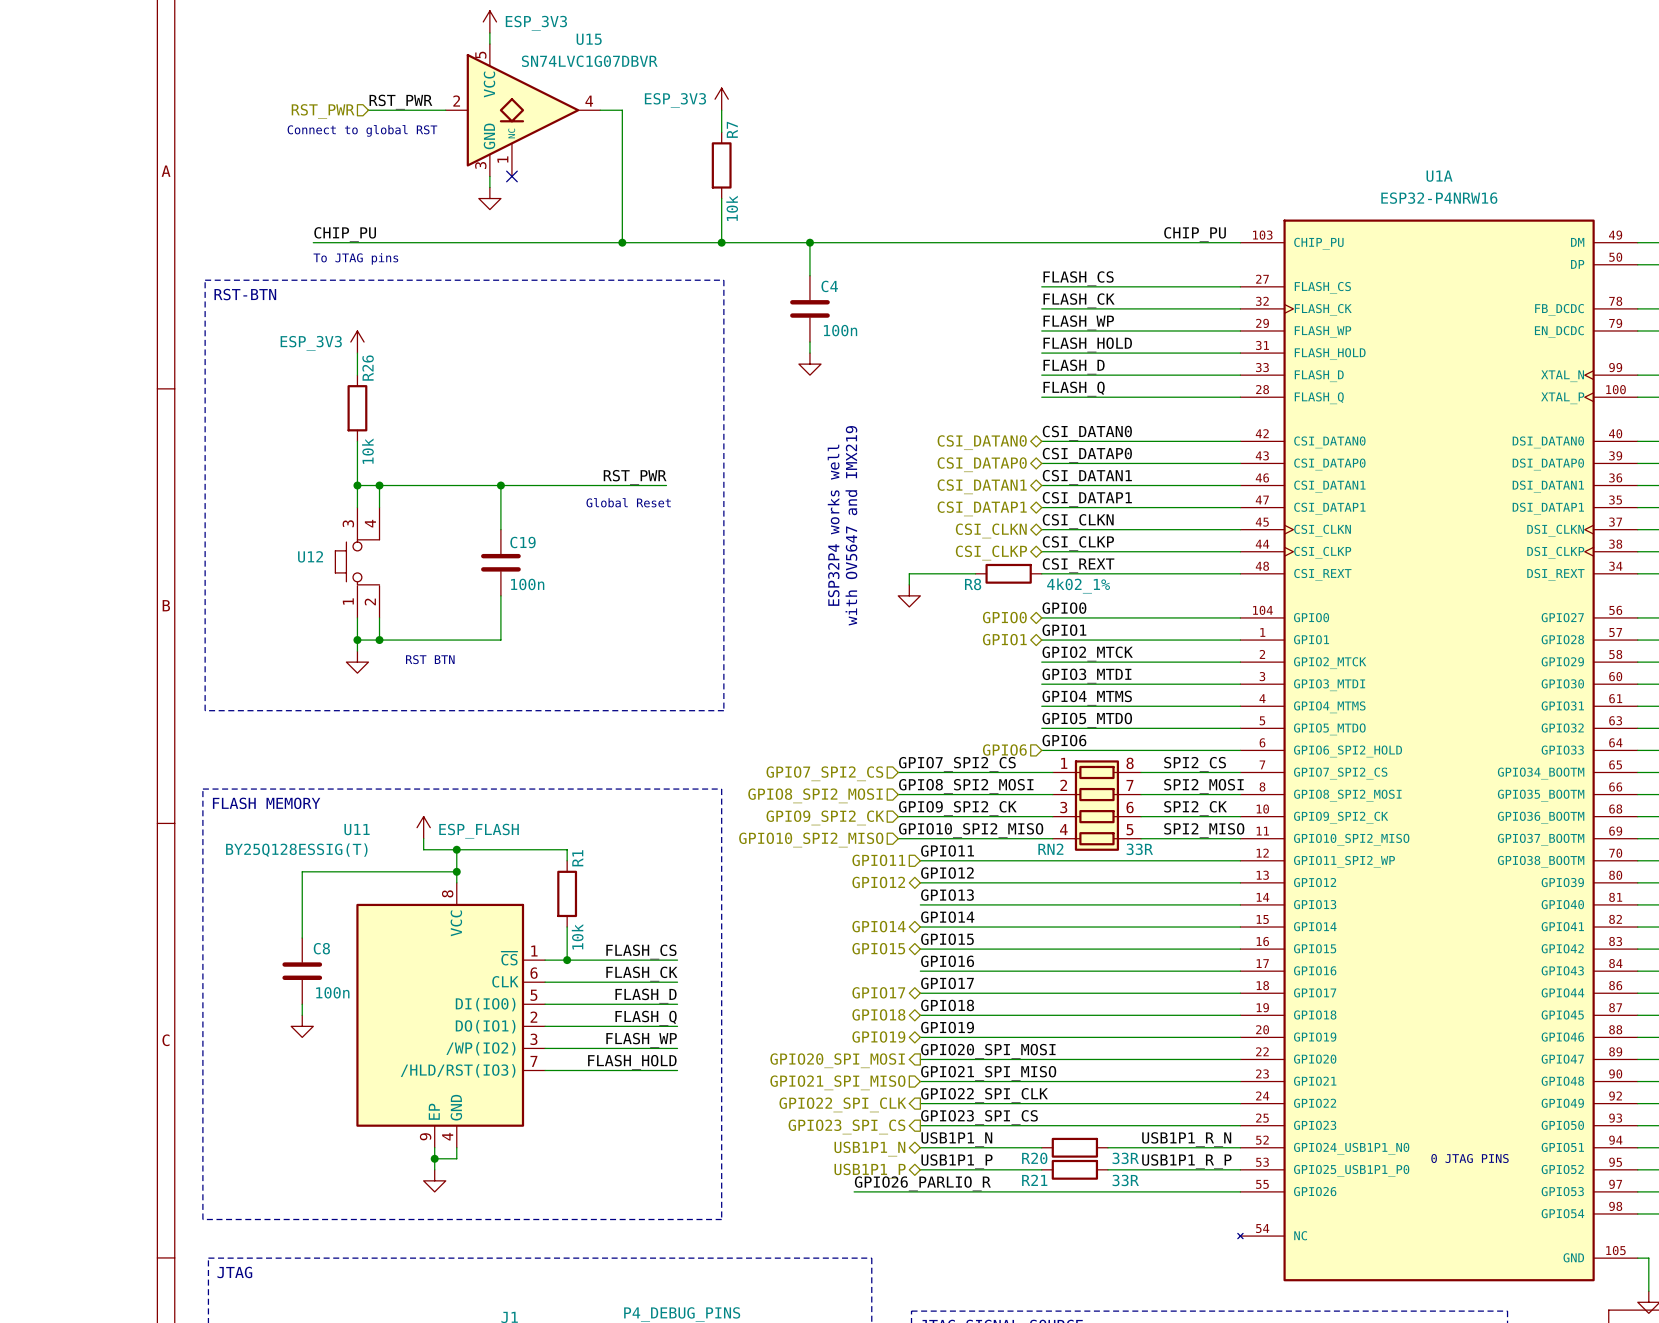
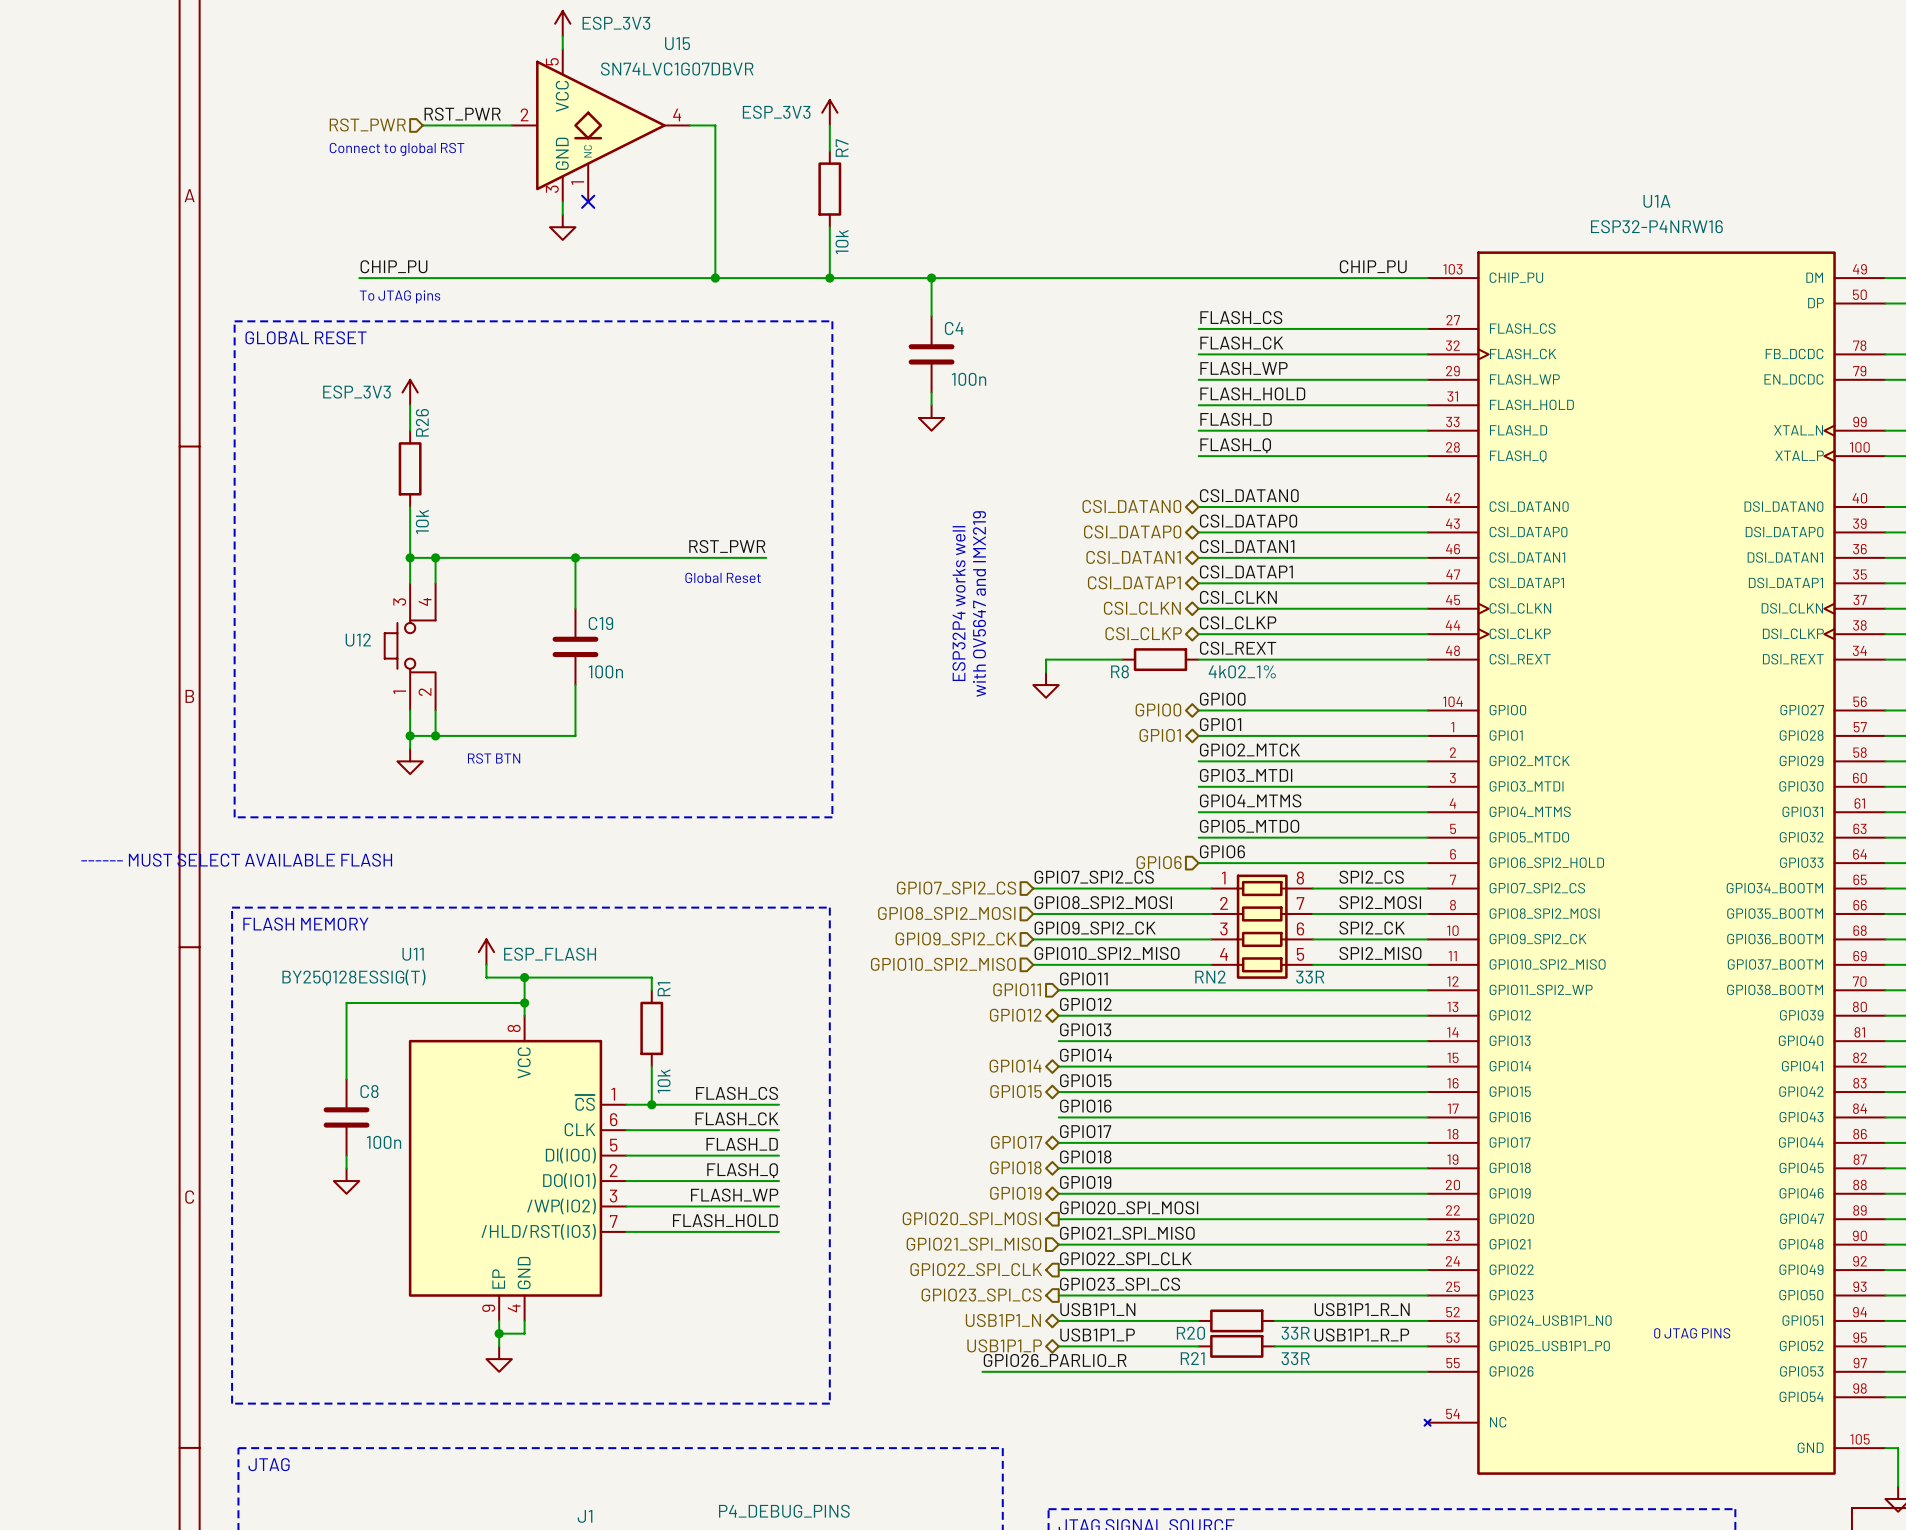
text: RST-BTN (245, 294) -> GLOBAL RESET (306, 337)
text: none -> ------ MUST SELECT AVAILABLE FLASH (236, 860)

